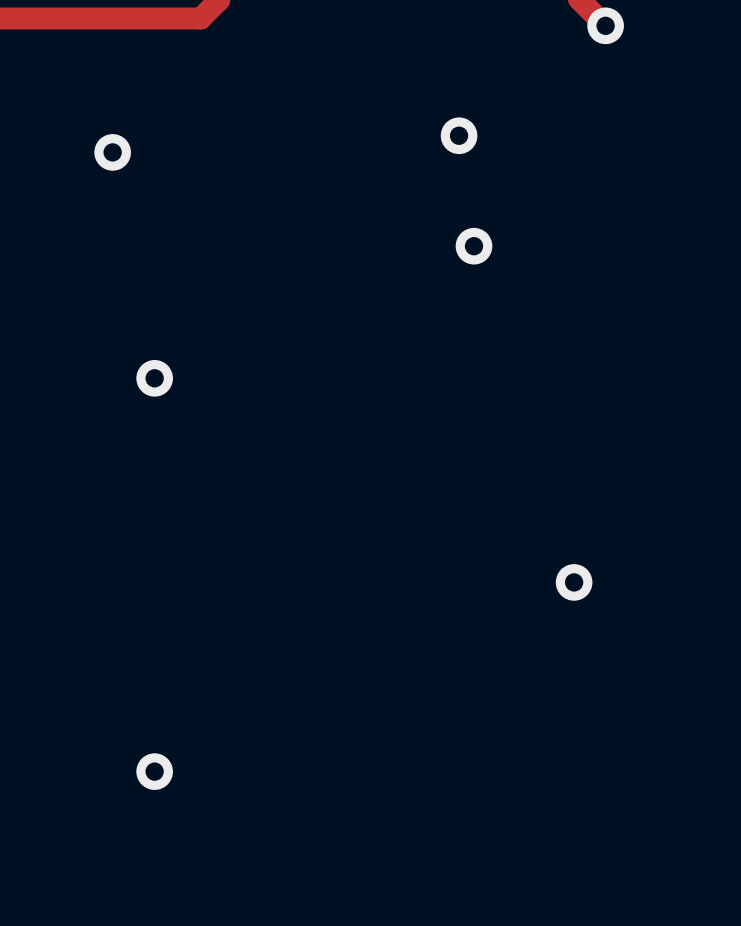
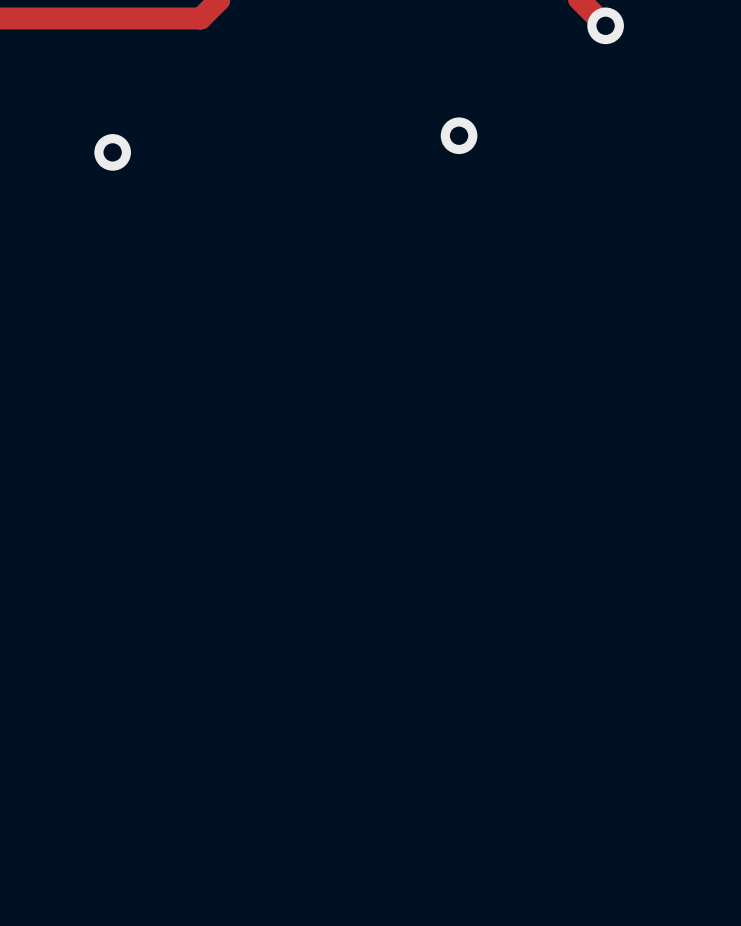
via: (474, 246) -> none
via: (154, 378) -> none
via: (574, 582) -> none
via: (154, 771) -> none

